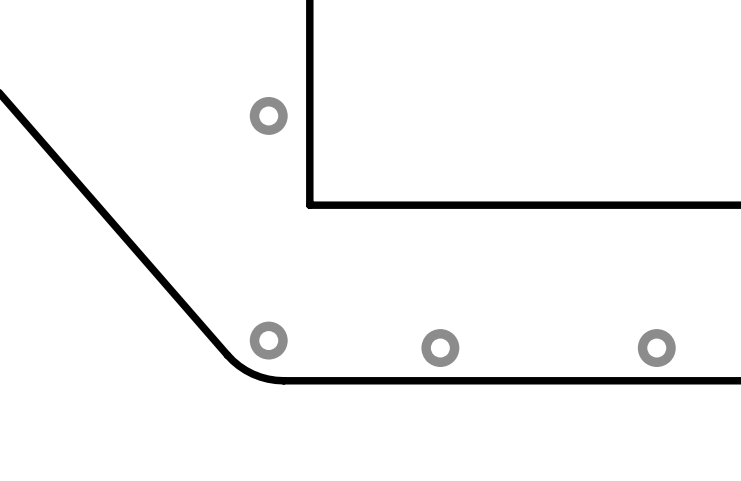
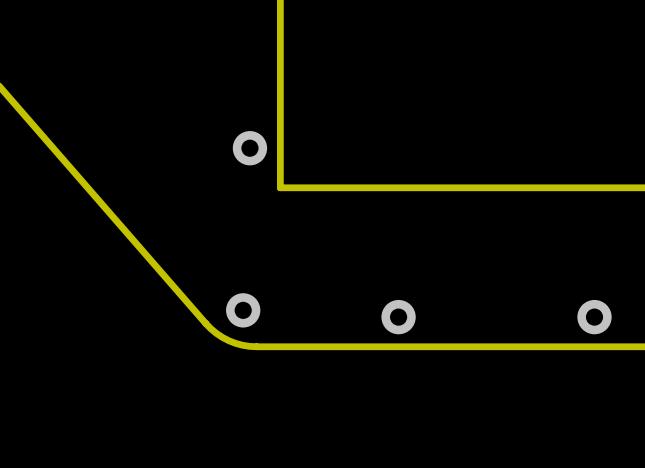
via position: (268, 115) -> (249, 148)

